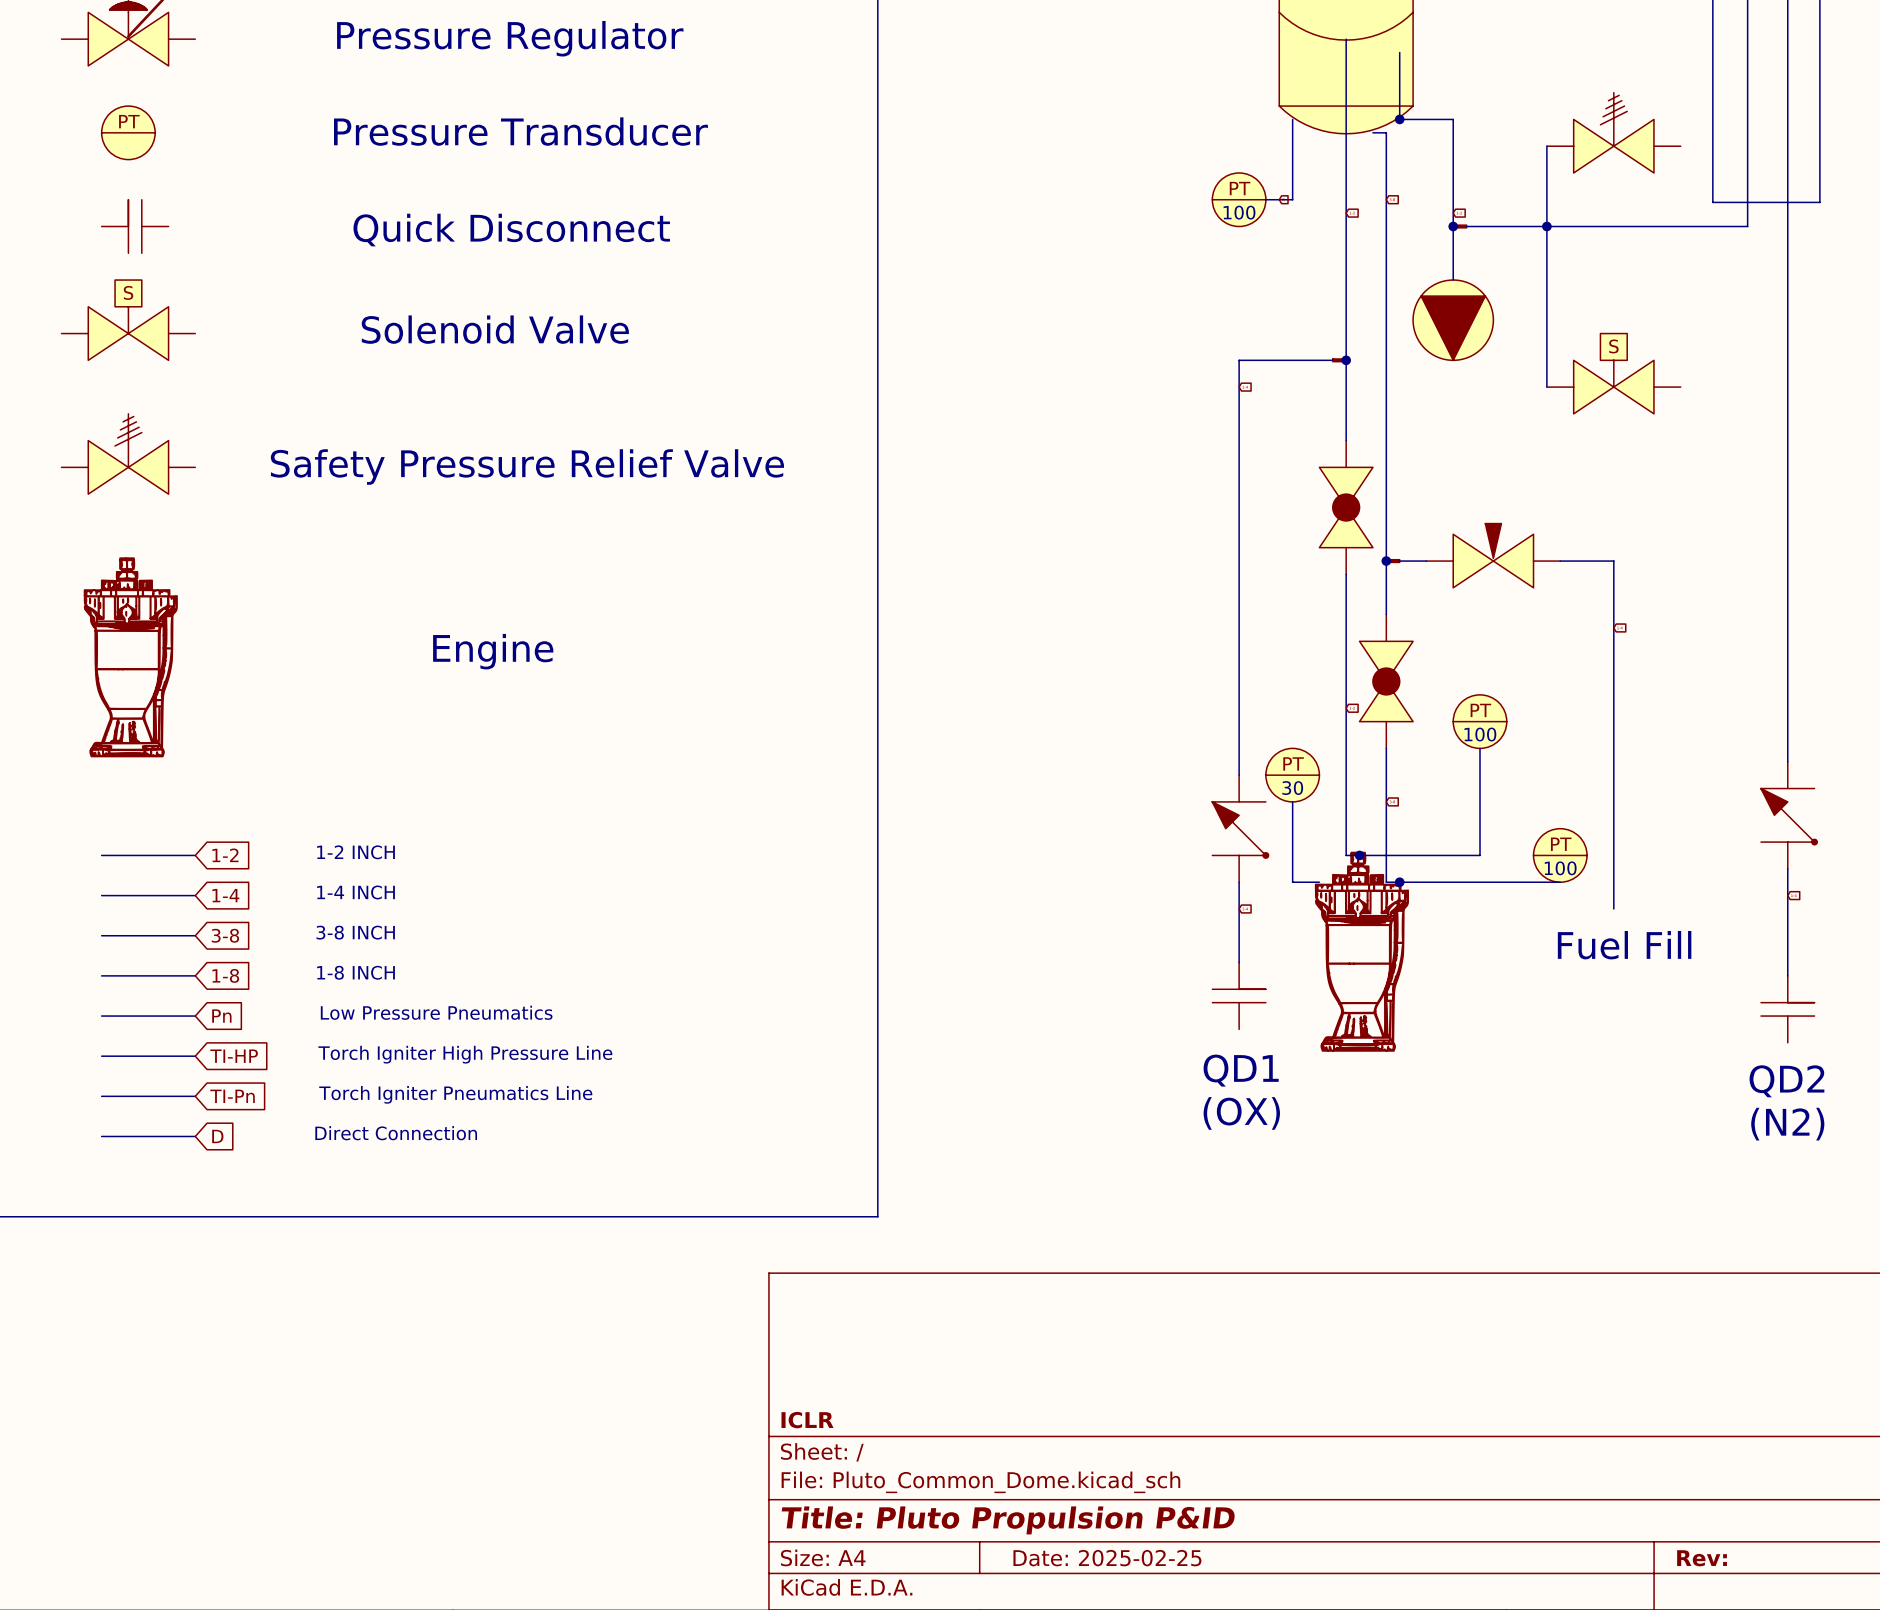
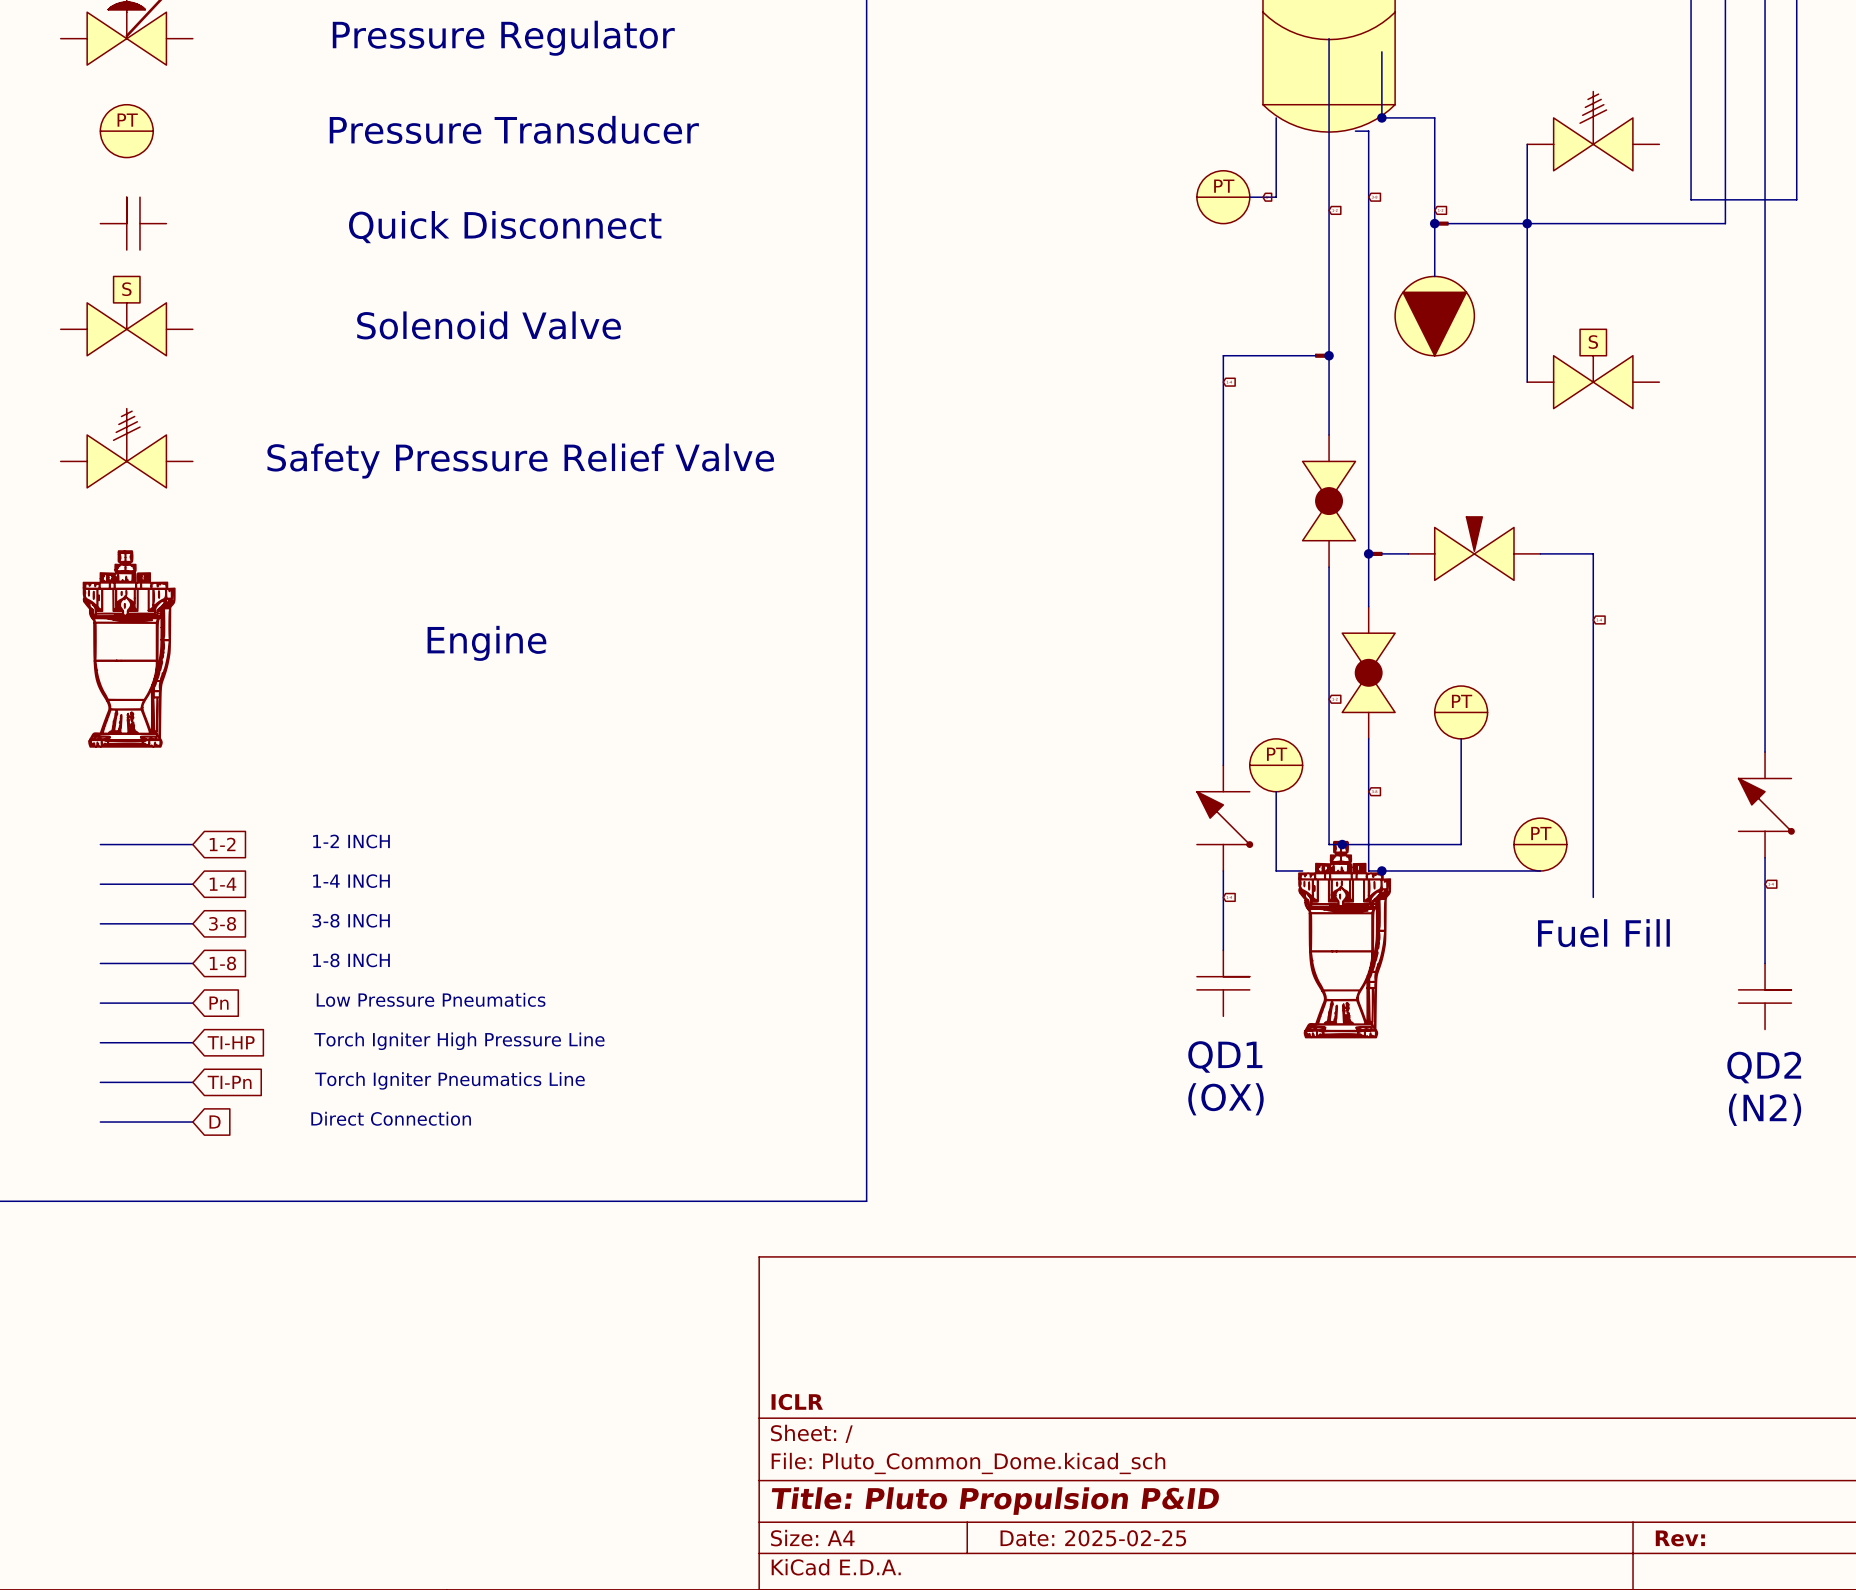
part value: 100 (1239, 212) -> none
part value: 100 (1480, 734) -> none
part value: 30 (1292, 788) -> none
part value: 100 (1560, 868) -> none

